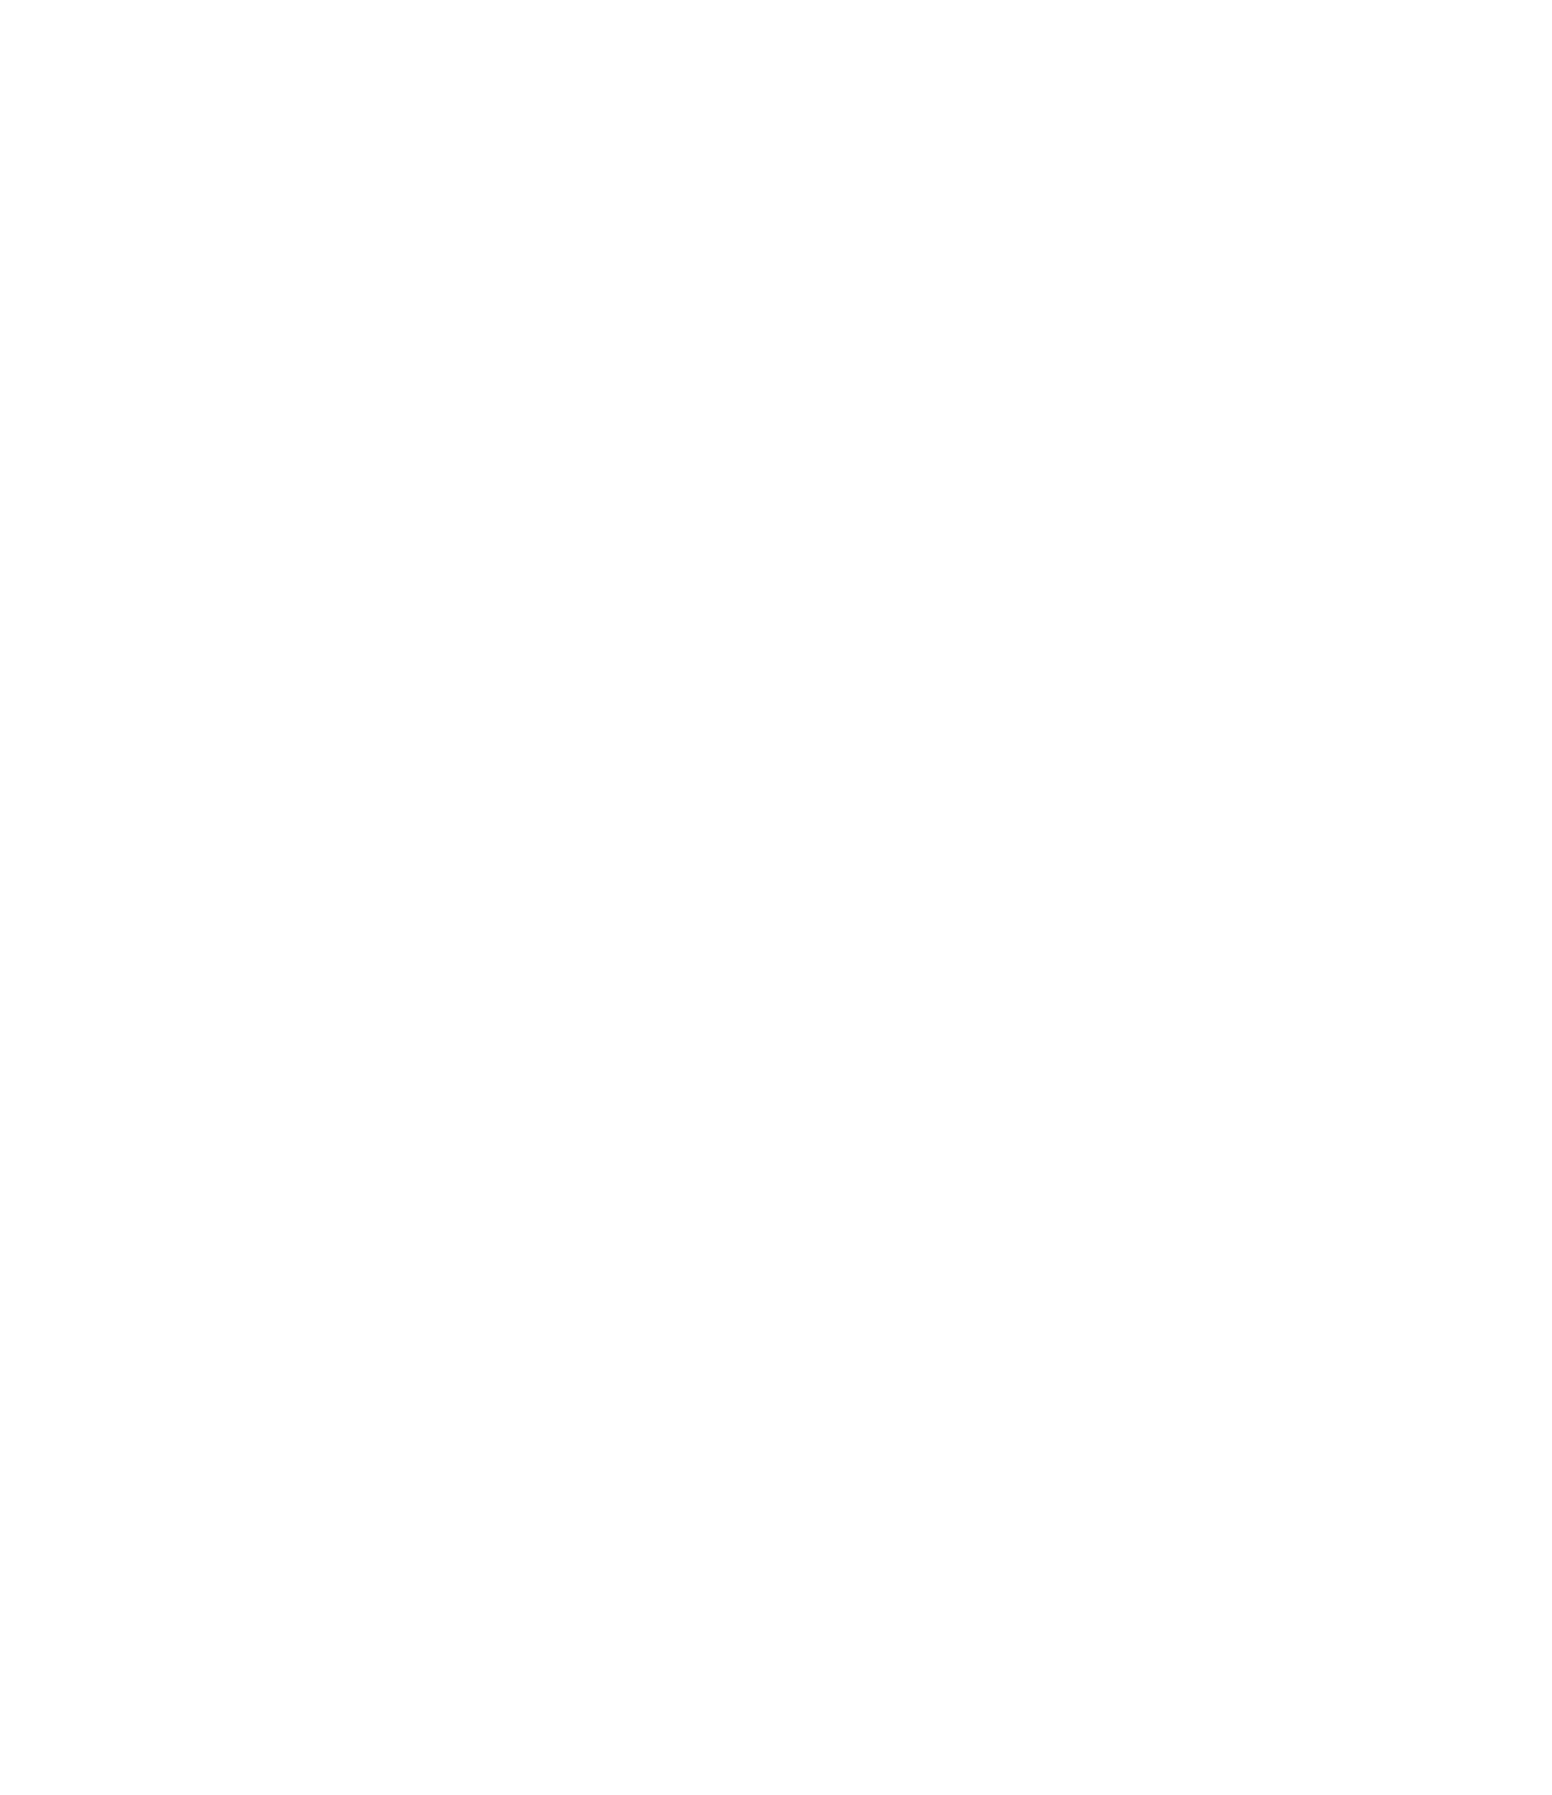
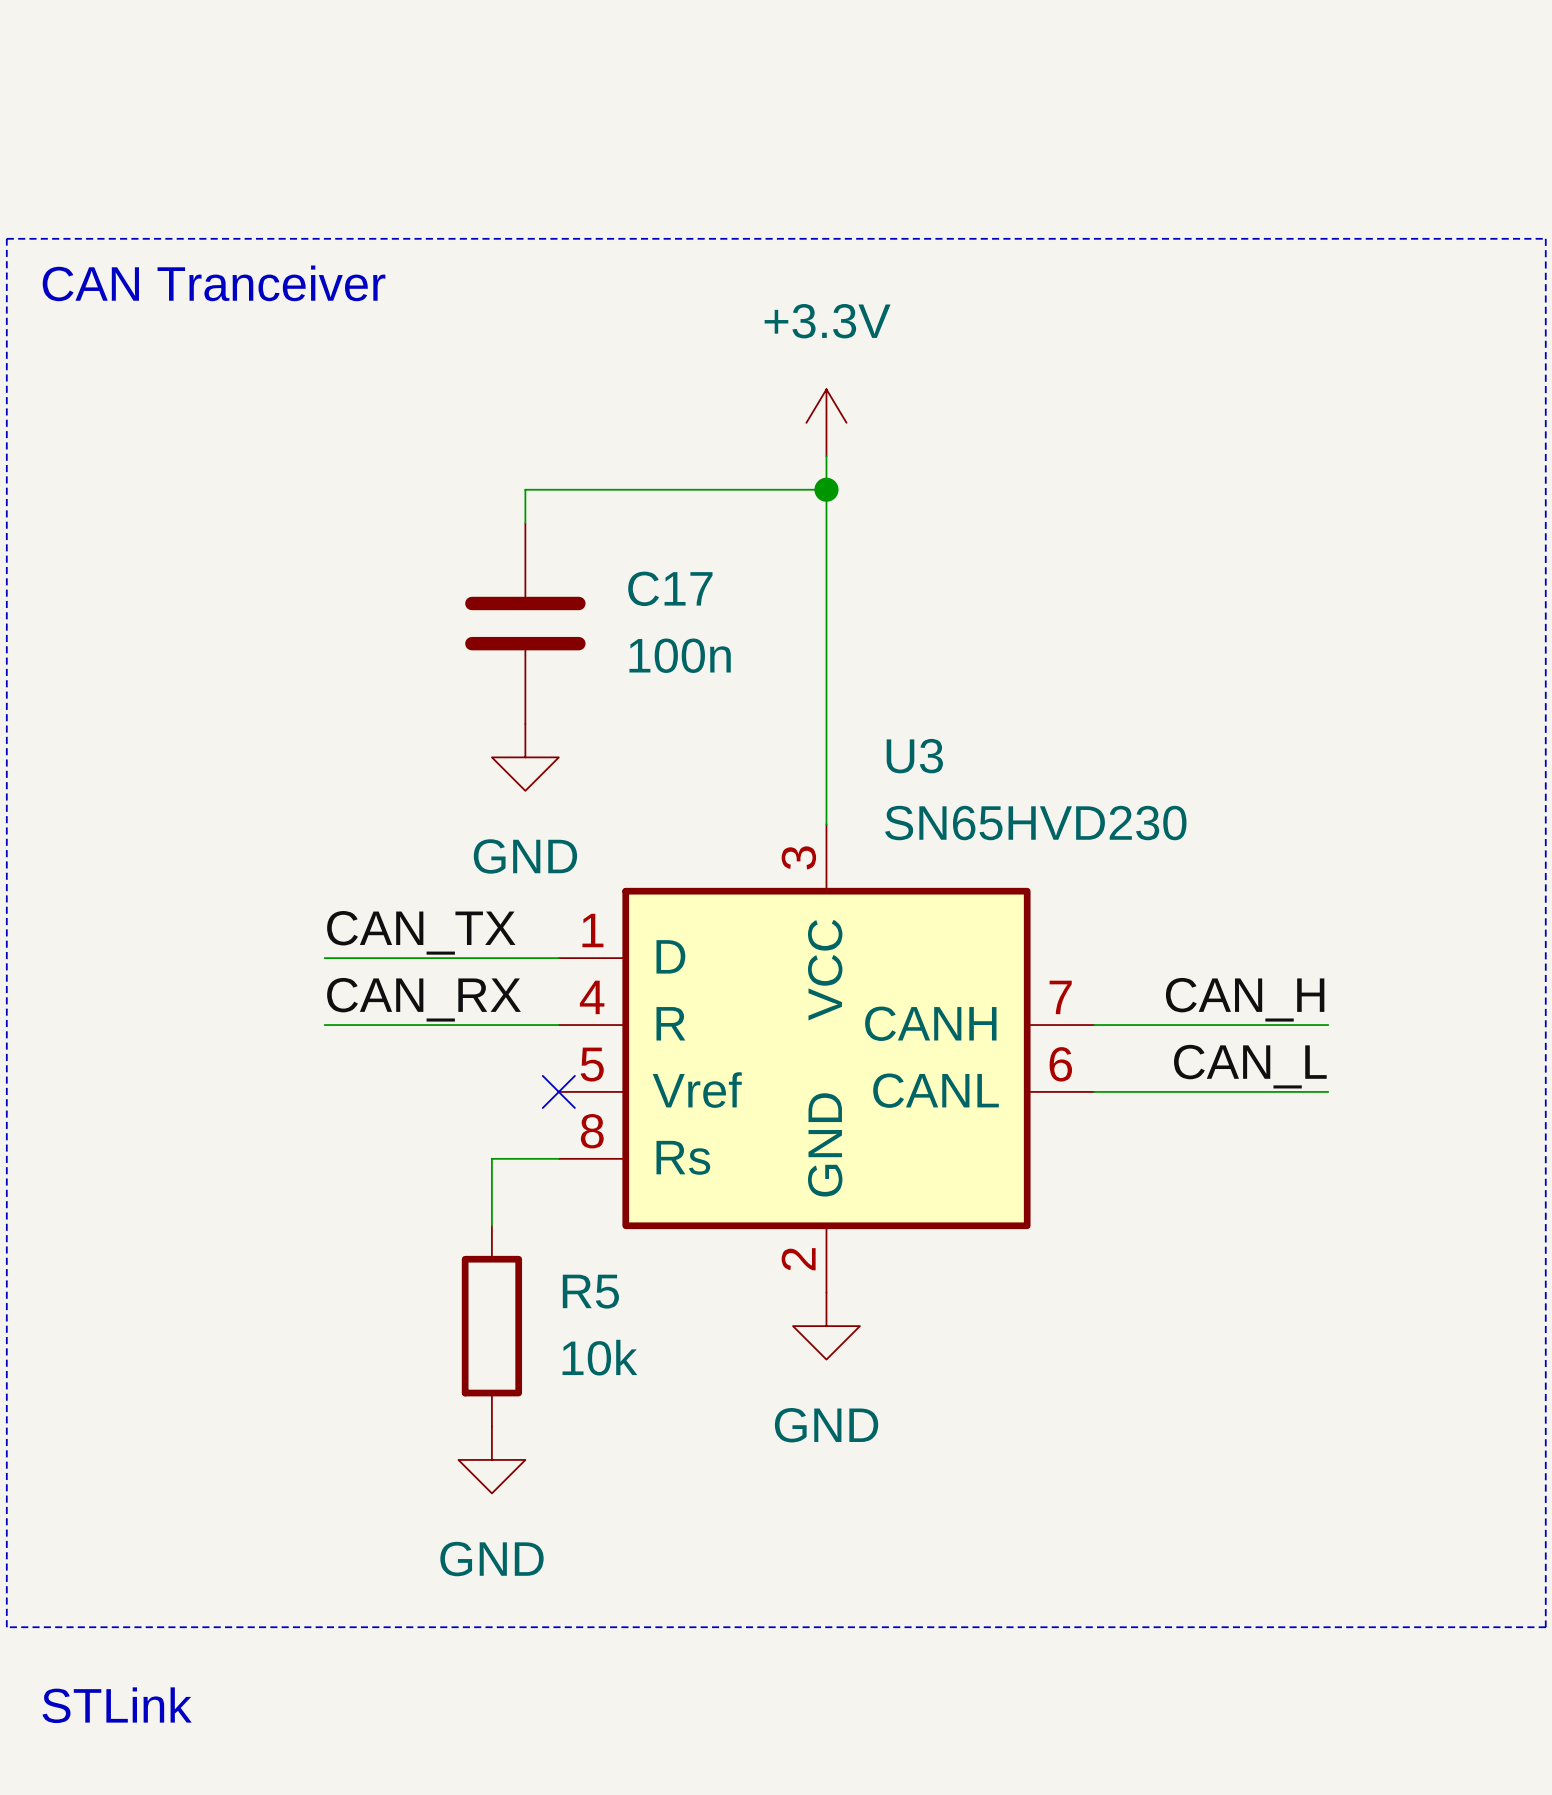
line: none -> (6, 238) (1545, 238) (1545, 1627) (6, 1627) (6, 238)
text: none -> CAN Tranceiver (214, 283)
power symbol: none -> +3.3V (826, 422)
wire: none -> (826, 456) (826, 824)
wire: none -> (826, 489) (525, 489) (525, 523)
junction: none -> (826, 489)
C17: none -> 100n (525, 623)
power symbol: none -> GND (525, 757)
label: none -> CAN_TX (421, 932)
wire: none -> (324, 958) (558, 958)
label: none -> CAN_RX (424, 999)
label: none -> CAN_H (1245, 999)
wire: none -> (324, 1025) (558, 1025)
wire: none -> (1094, 1025) (1328, 1025)
U3: none -> SN65HVD230 (826, 1058)
label: none -> CAN_L (1250, 1066)
no-connect mark: none -> (558, 1091)
wire: none -> (1094, 1091) (1328, 1091)
wire: none -> (558, 1158) (491, 1158) (491, 1225)
R5: none -> 10k (491, 1326)
power symbol: none -> GND (826, 1326)
power symbol: none -> GND (491, 1459)
text: none -> STLink (117, 1705)

